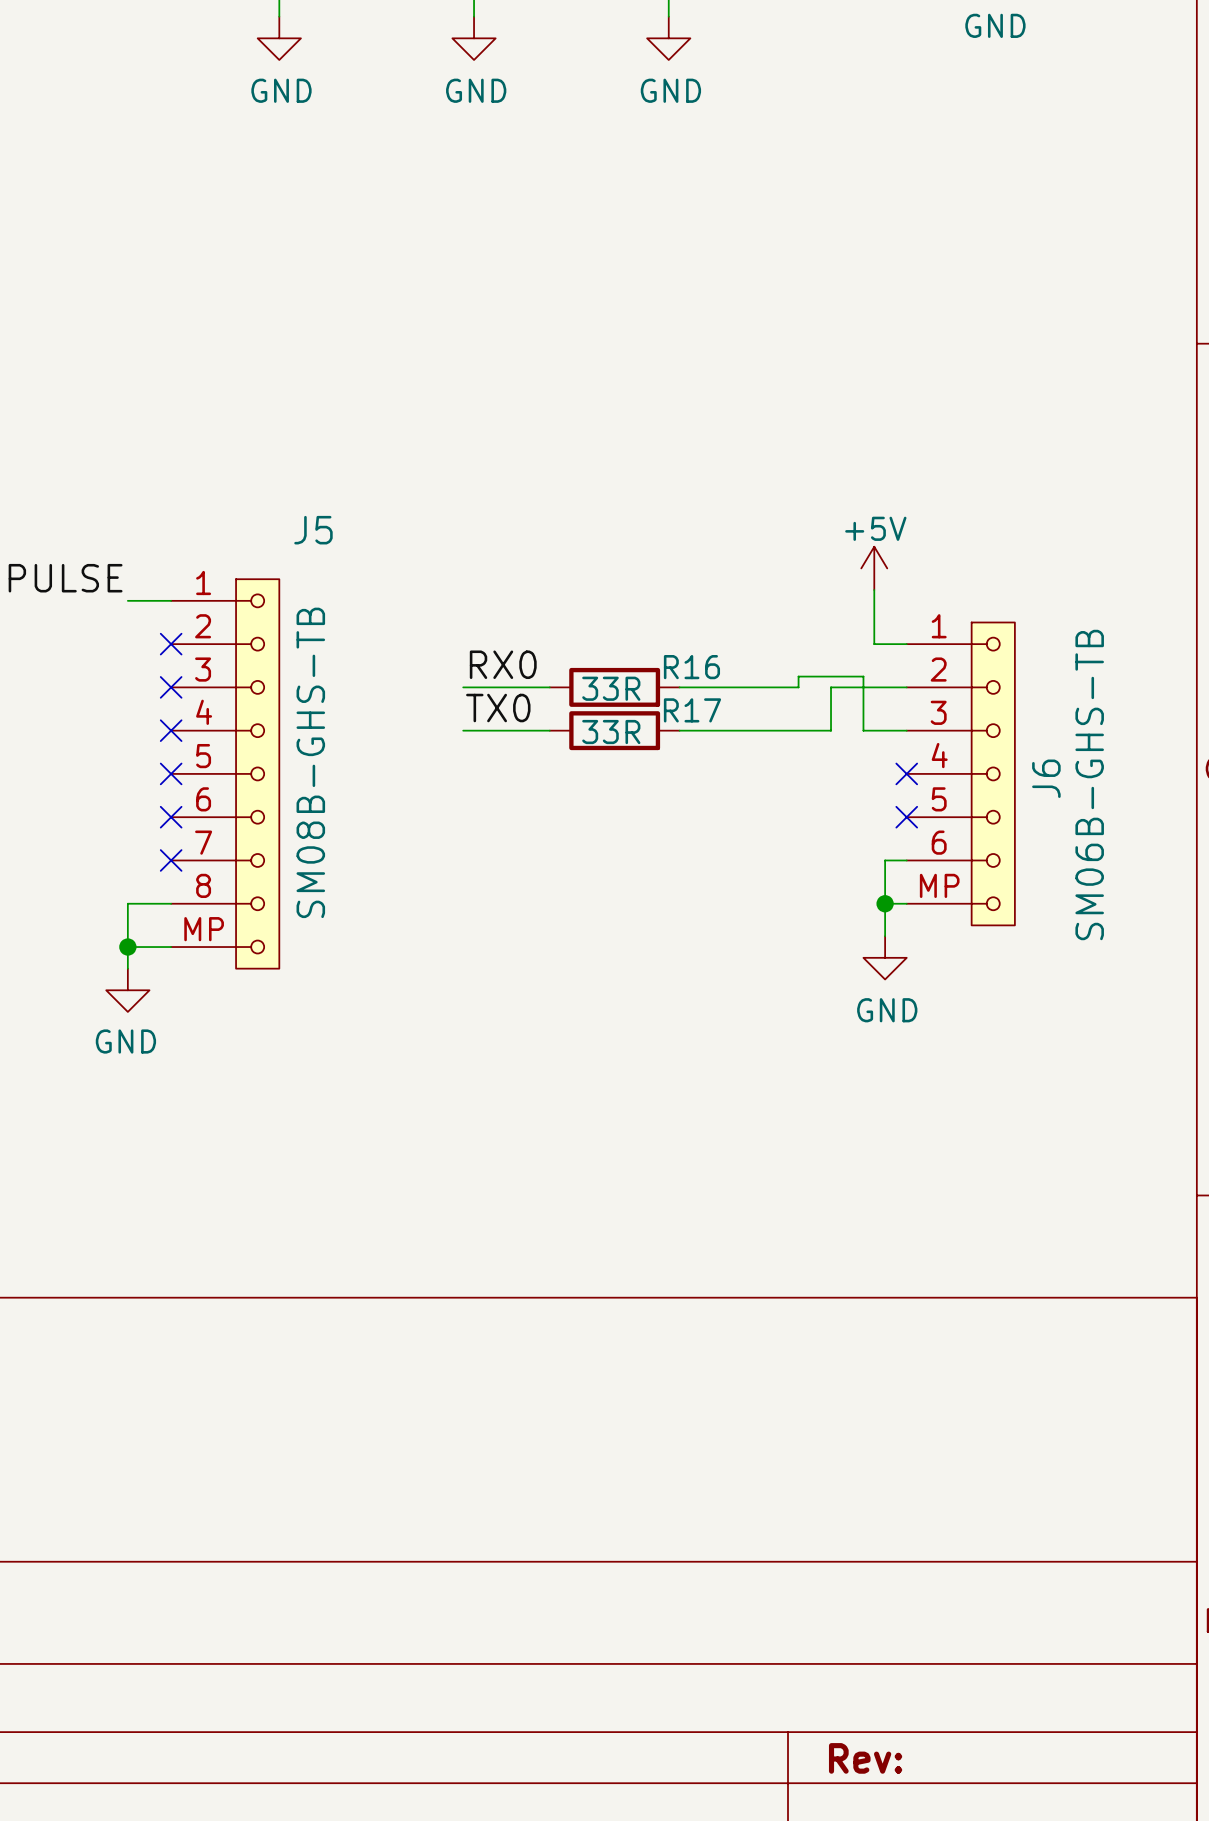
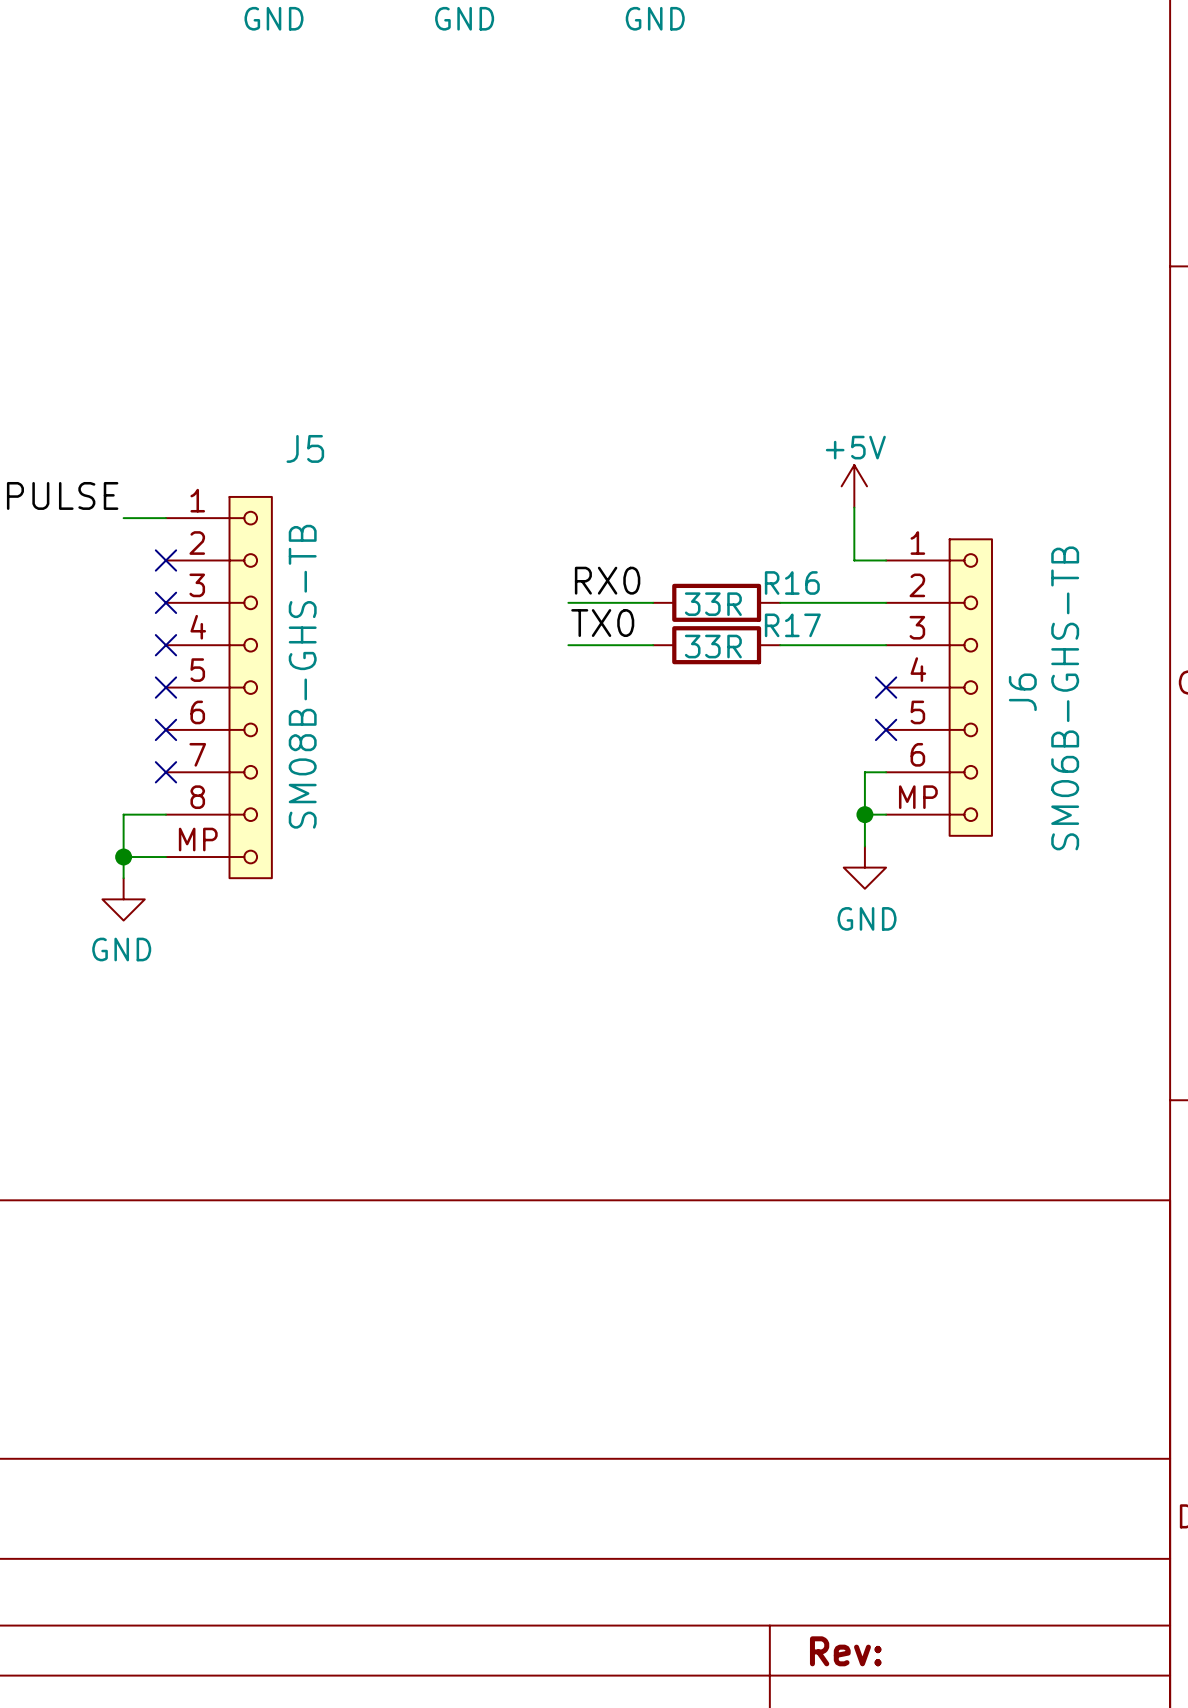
label position: RX0 (503, 664) -> RX0 (607, 580)
wire: (463, 687) (549, 687) -> (568, 602) (653, 602)
R16 position: (614, 687) -> (716, 602)
wire: (679, 687) (798, 687) (798, 676) (863, 676) (863, 730) -> (811, 645) (843, 645)
wire: (831, 687) (831, 730) -> (811, 602) (780, 602)
label position: TX0 (498, 708) -> TX0 (602, 623)
wire: (463, 730) (549, 730) -> (568, 645) (653, 645)
R17 position: (614, 730) -> (716, 645)
wire: (679, 730) (798, 730) -> none

